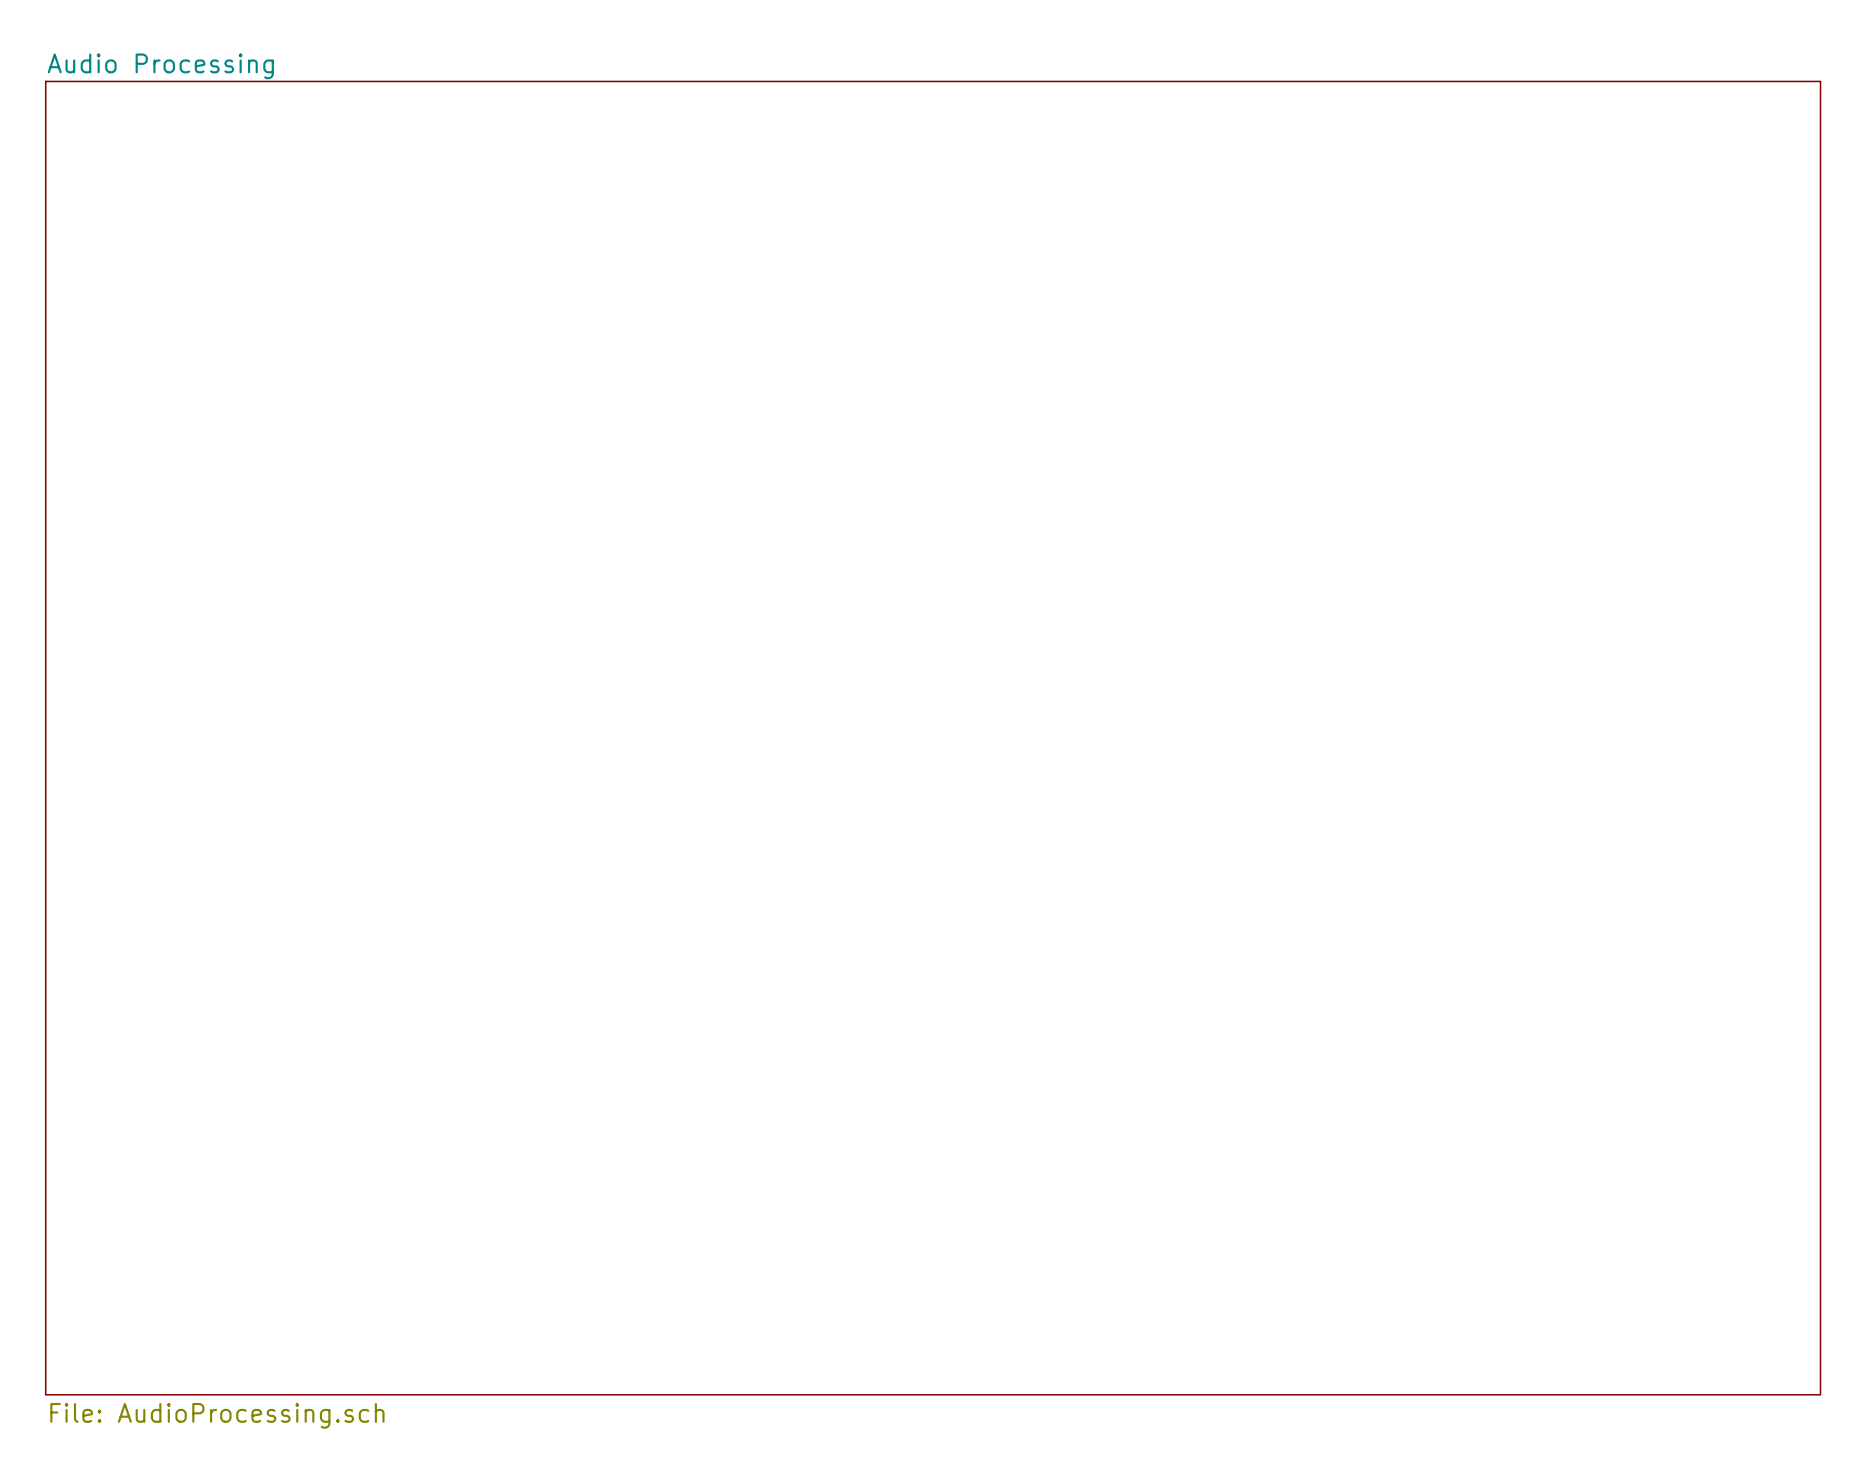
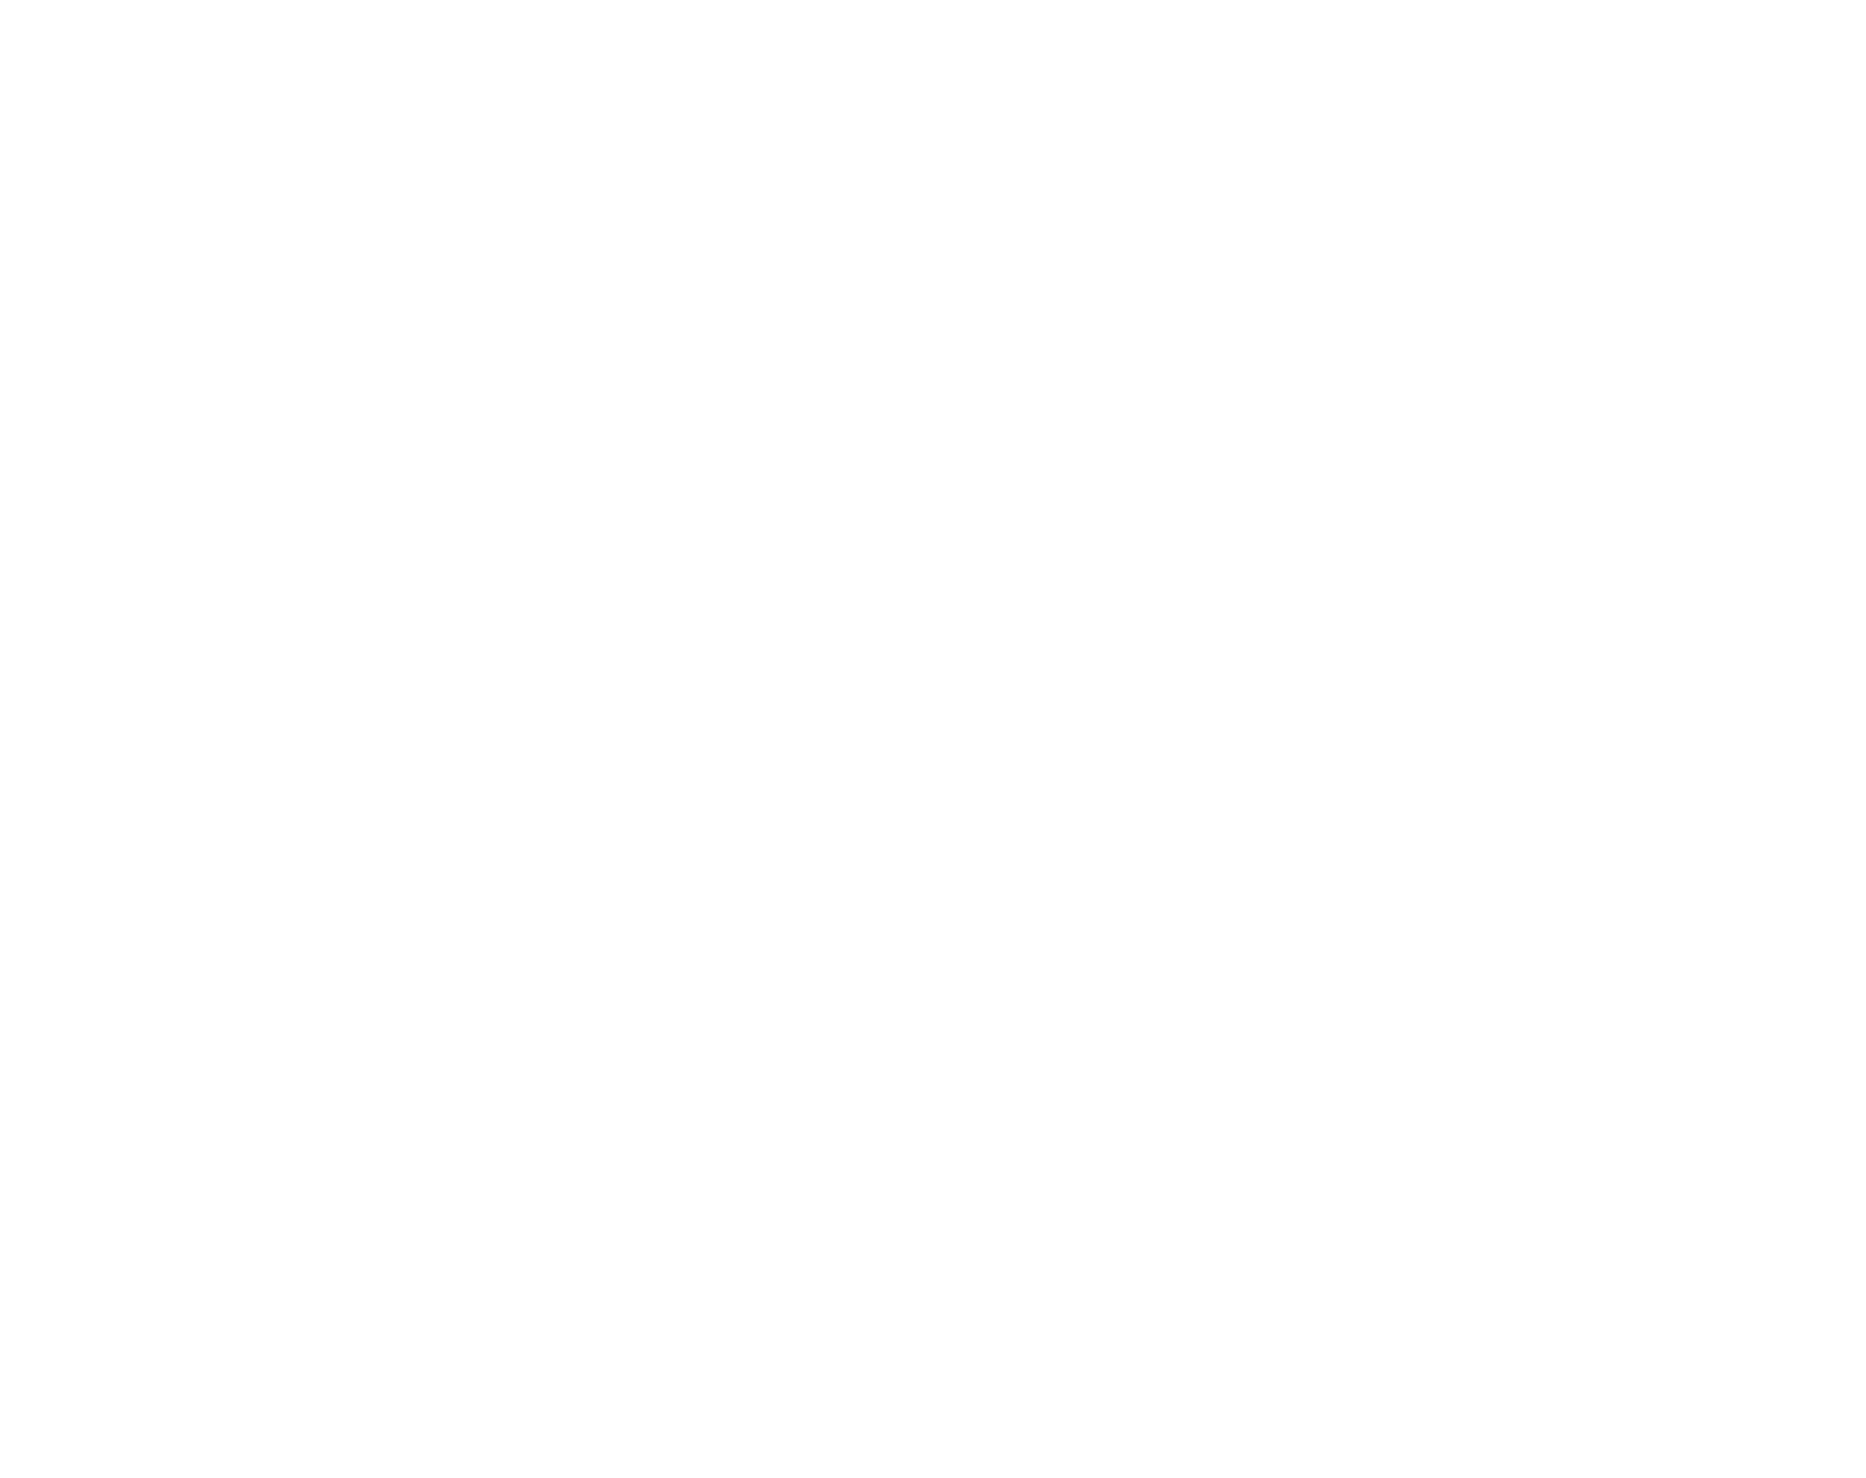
sheet Audio Processing: File: AudioProcessing.sch (933, 738) -> none

